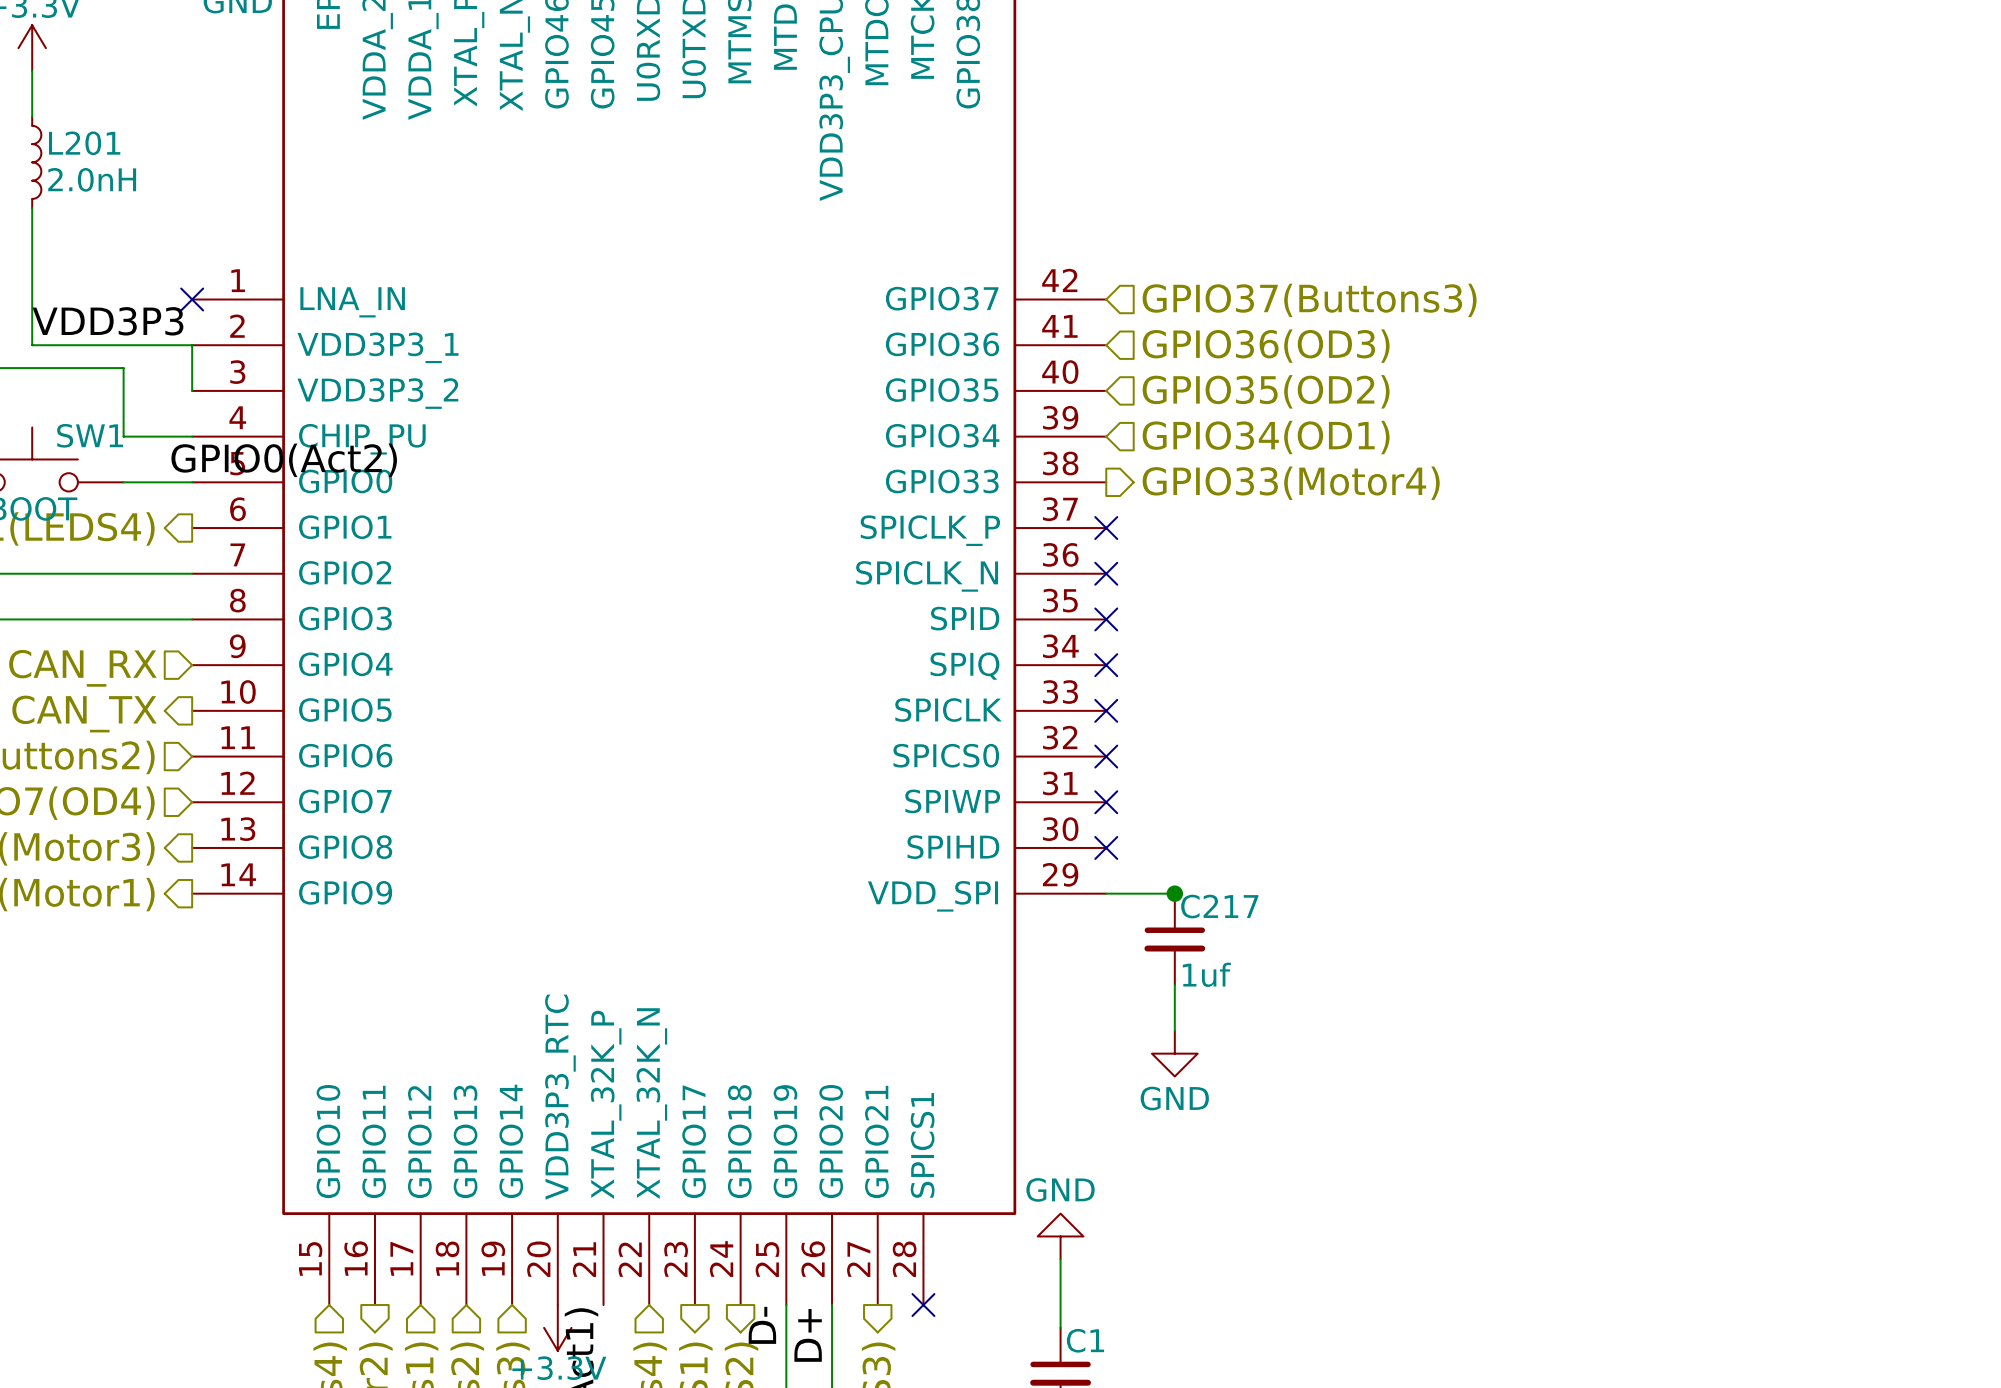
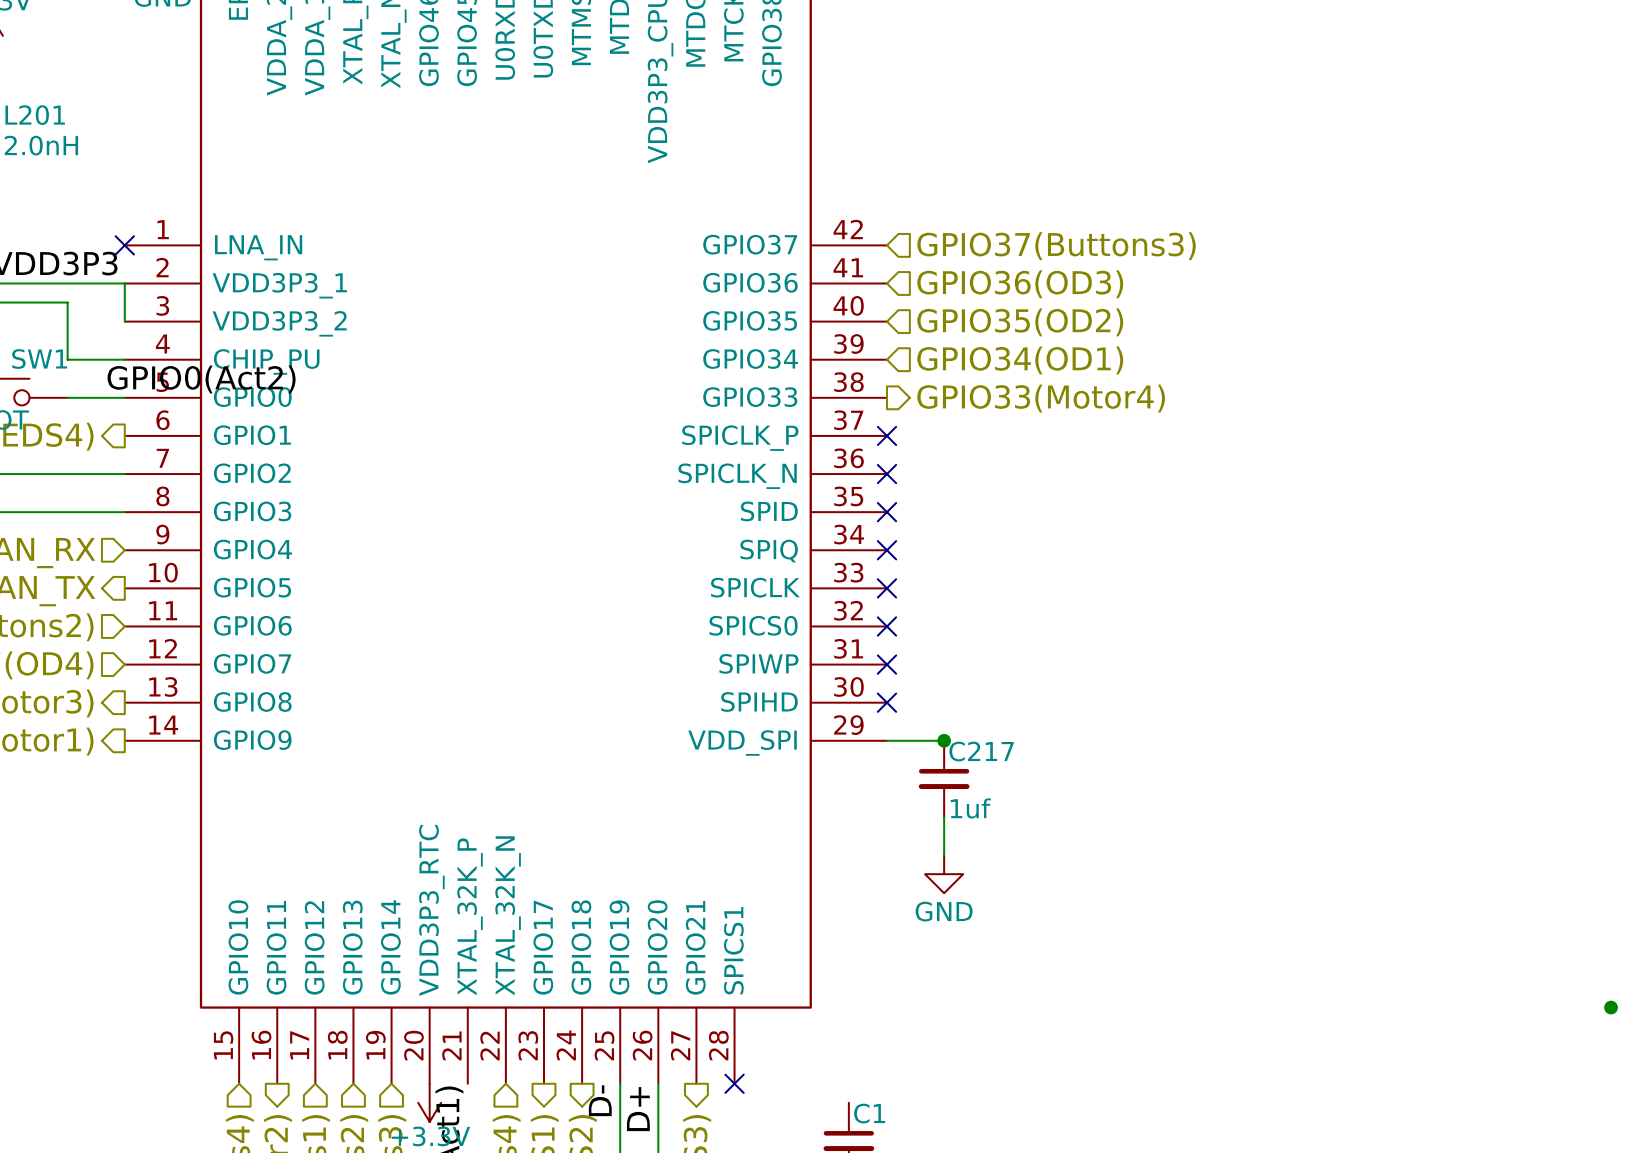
junction: none -> (1611, 1007)
power symbol: GND (1060, 1236) -> none
wire: (1060, 1259) (1060, 1327) -> none

